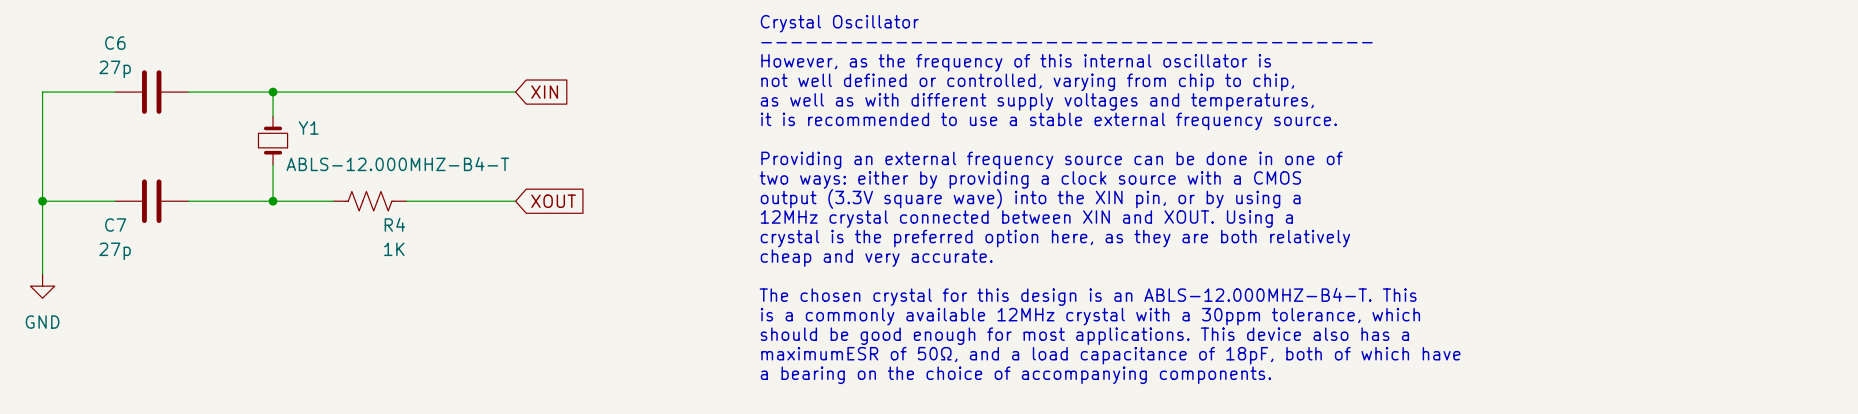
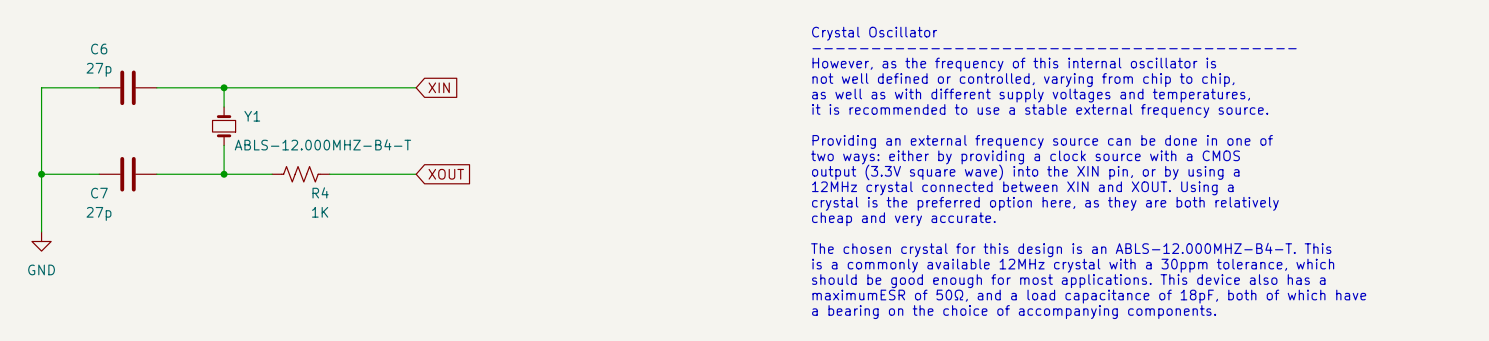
text: Crystal Oscillator (839, 23) -> none
text: none -> Crystal Oscillator (874, 33)
text: ----------------------------------------- (1067, 42) -> none
text: none -> ----------------------------------------- (1054, 48)
text: However, as the frequency of this internal oscillator is (1016, 62) -> none
text: none -> However, as the frequency of this internal oscillator is (1014, 64)
text: not well defined or controlled, varying from chip to chip, (1027, 82) -> none
text: none -> not well defined or controlled, varying from chip to chip, (1023, 80)
text: as well as with different supply voltages and temperatures, (1037, 101) -> none
text: none -> as well as with different supply voltages and temperatures, (1031, 95)
text: it is recommended to use a stable external frequency source. (1048, 121) -> none
text: none -> it is recommended to use a stable external frequency source. (1040, 111)
text: Providing an external frequency source can be done in one of (1051, 160) -> none
text: none -> Providing an external frequency source can be done in one of (1042, 141)
text: two ways: either by providing a clock source with a CMOS (1030, 179) -> none
text: none -> two ways: either by providing a clock source with a CMOS (1025, 157)
text: output (3.3V square wave) into the XIN pin, or by using a (1030, 198) -> none
text: none -> output (3.3V square wave) into the XIN pin, or by using a (1025, 172)
text: 12MHz crystal connected between XIN and XOUT. Using a (1026, 219) -> none
text: none -> 12MHz crystal connected between XIN and XOUT. Using a (1022, 188)
text: crystal is the preferred option here, as they are both relatively (1055, 238) -> none
text: none -> crystal is the preferred option here, as they are both relatively (1045, 203)
text: cheap and very accurate. (876, 258) -> none
text: none -> cheap and very accurate. (903, 219)
text: The chosen crystal for this design is an ABLS-12.000MHZ-B4-T. This (1088, 296) -> none
text: none -> The chosen crystal for this design is an ABLS-12.000MHZ-B4-T. This (1071, 249)
text: is a commonly available 12MHz crystal with a 30ppm tolerance, which (1090, 316) -> none
text: none -> is a commonly available 12MHz crystal with a 30ppm tolerance, which (1073, 265)
text: should be good enough for most applications. This device also has a (1084, 336) -> none
text: none -> should be good enough for most applications. This device also has a (1068, 281)
text: maximumESR of 50Ω, and a load capacitance of 18pF, both of which have (1110, 355) -> none
text: none -> maximumESR of 50Ω, and a load capacitance of 18pF, both of which have (1089, 296)
text: a bearing on the choice of accompanying components. (1015, 375) -> none
text: none -> a bearing on the choice of accompanying components. (1014, 312)

